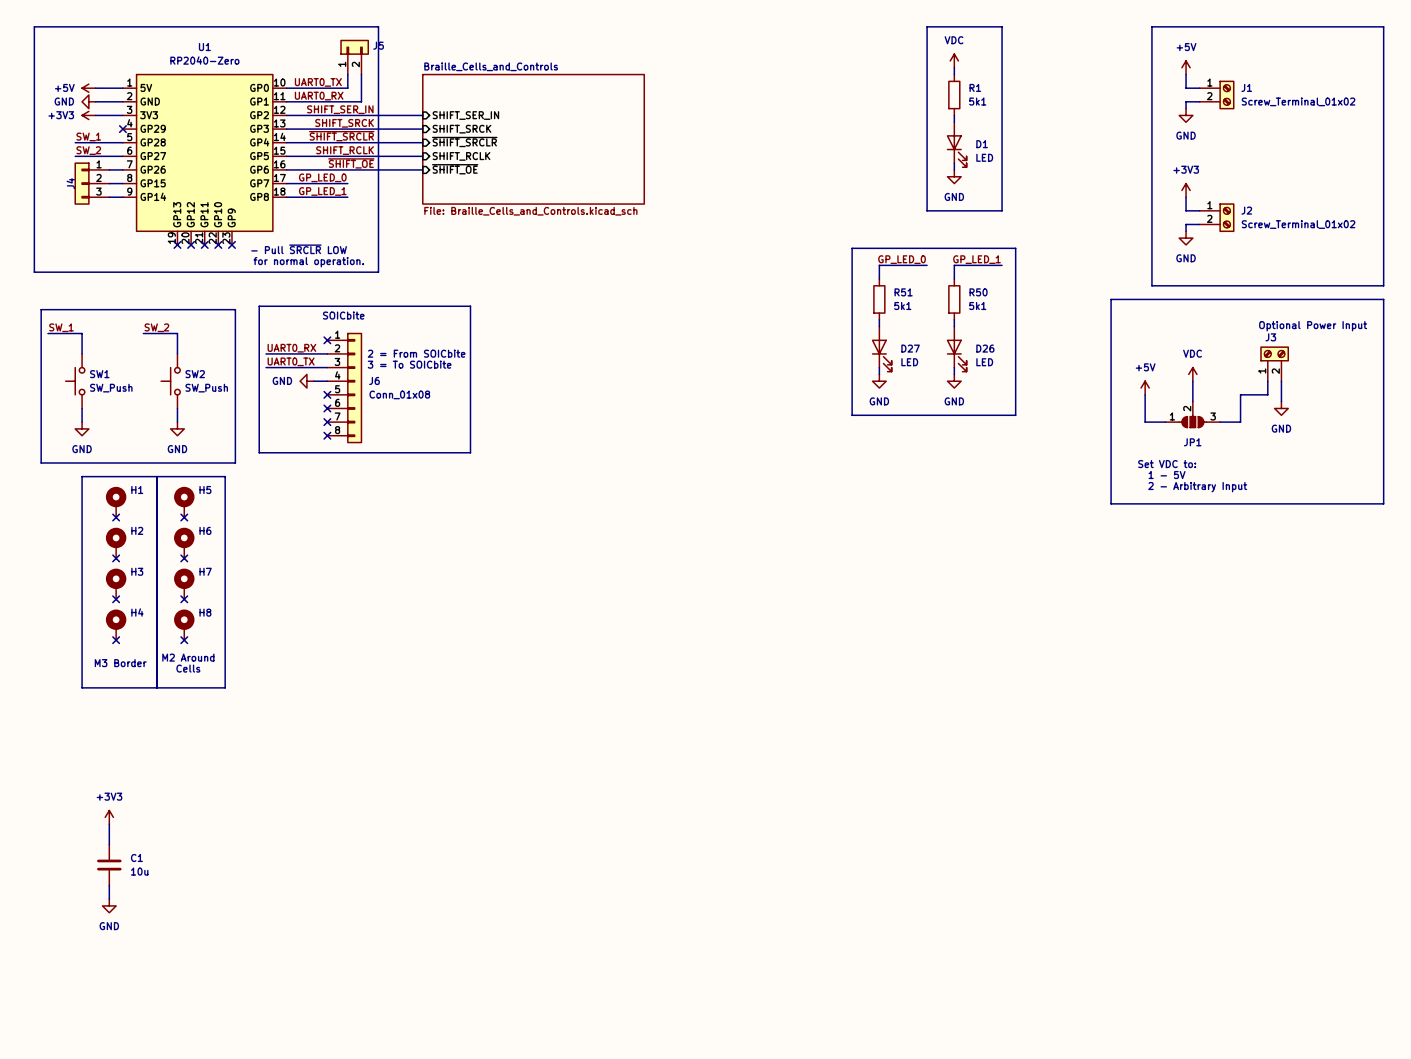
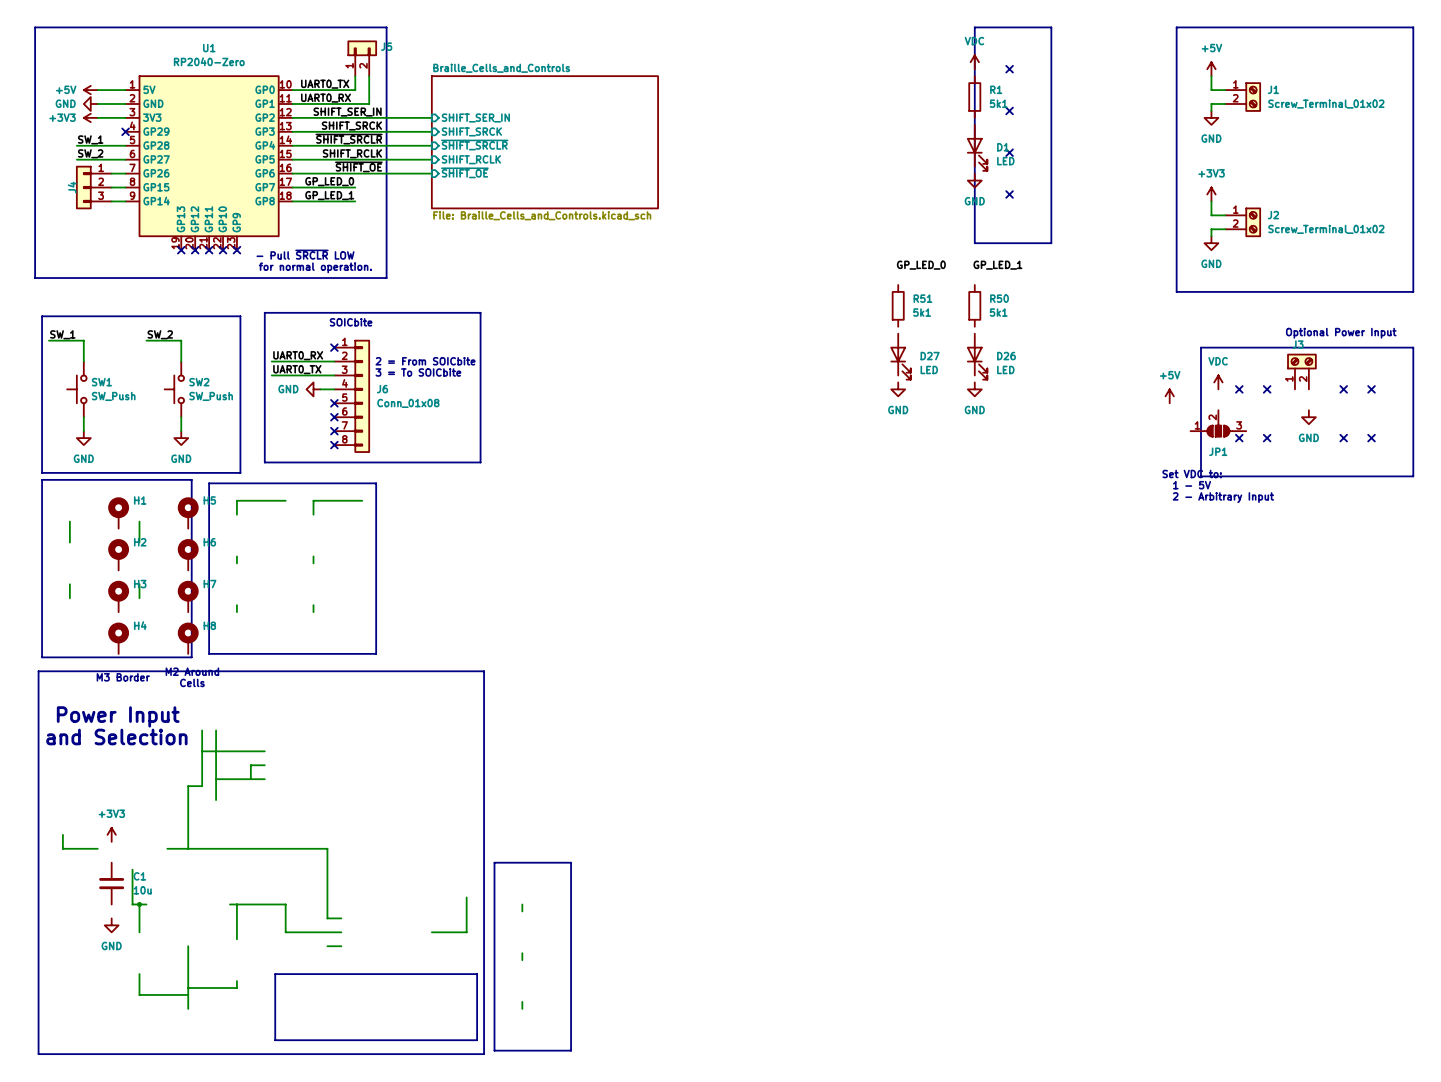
line: (954, 26) (927, 26) (927, 210) (1002, 210) (1002, 26) -> (974, 27) (974, 243) (1051, 243) (1051, 27) (1023, 27)
no-connect mark: none -> (1009, 69)
no-connect mark: none -> (1009, 110)
no-connect mark: none -> (1009, 152)
no-connect mark: none -> (1009, 194)
line: (852, 248) (1015, 248) (1015, 415) (852, 415) (852, 248) -> none
wire: (927, 265) (879, 265) (879, 278) -> none
wire: (1002, 265) (954, 265) (954, 278) -> none
wire: (879, 319) (879, 326) -> none
wire: (954, 319) (954, 326) -> none
line: (1383, 340) (1383, 299) (1111, 299) (1111, 503) (1383, 503) (1383, 466) -> (1413, 347) (1201, 347) (1201, 476) (1413, 476)
wire: (879, 367) (879, 374) -> none
wire: (954, 367) (954, 374) -> none
wire: (1192, 381) (1192, 401) -> none
no-connect mark: none -> (1239, 389)
no-connect mark: none -> (1267, 389)
wire: (1267, 381) (1267, 394) (1240, 394) (1240, 422) (1220, 422) -> none
wire: (1281, 381) (1281, 401) -> none
no-connect mark: none -> (1343, 389)
no-connect mark: none -> (1371, 389)
wire: (1145, 394) (1145, 422) (1165, 422) -> none
no-connect mark: none -> (1239, 438)
no-connect mark: none -> (1267, 438)
no-connect mark: none -> (1343, 438)
no-connect mark: none -> (1371, 438)
line: none -> (42, 479) (191, 479) (191, 657) (42, 657) (42, 479)
line: none -> (209, 483) (376, 483) (376, 653) (209, 653) (209, 483)
line: (82, 476) (225, 476) (225, 687) (82, 687) (82, 476) -> none
line: (157, 476) (157, 687) -> none
wire: none -> (285, 500) (236, 500) (236, 514)
wire: none -> (362, 500) (313, 500) (313, 514)
wire: none -> (69, 521) (69, 542)
wire: none -> (139, 521) (139, 542)
no-connect mark: (116, 517) -> none
no-connect mark: (184, 517) -> none
wire: none -> (236, 556) (236, 563)
wire: none -> (313, 556) (313, 563)
no-connect mark: (116, 558) -> none
no-connect mark: (184, 558) -> none
wire: none -> (69, 584) (69, 598)
wire: none -> (139, 584) (139, 598)
wire: none -> (236, 605) (236, 612)
wire: none -> (313, 605) (313, 612)
no-connect mark: (116, 599) -> none
no-connect mark: (184, 599) -> none
no-connect mark: (116, 640) -> none
no-connect mark: (184, 640) -> none
line: none -> (38, 671) (484, 671) (484, 1054) (38, 1054) (38, 671)
text: none -> Power Input (118, 716)
wire: none -> (202, 730) (202, 786) (188, 786) (188, 848)
wire: none -> (216, 730) (216, 800)
text: none -> and Selection (116, 736)
wire: none -> (202, 751) (264, 751)
wire: none -> (264, 765) (250, 765) (250, 779)
wire: none -> (216, 779) (264, 779)
wire: none -> (62, 834) (62, 848) (97, 848)
wire: (109, 824) (109, 844) -> none
wire: none -> (167, 848) (327, 848) (327, 918) (341, 918)
line: none -> (494, 862) (571, 862) (571, 1050) (494, 1050) (494, 862)
wire: none -> (132, 869) (132, 904) (146, 904)
wire: none -> (466, 897) (466, 932) (431, 932)
wire: (109, 885) (109, 899) -> none
wire: none -> (139, 904) (139, 932)
junction: none -> (139, 904)
wire: none -> (229, 904) (285, 904) (285, 932) (341, 932)
wire: none -> (236, 904) (236, 939)
wire: none -> (522, 904) (522, 911)
wire: none -> (188, 946) (188, 1008)
wire: none -> (327, 946) (341, 946)
wire: none -> (522, 953) (522, 960)
wire: none -> (139, 974) (139, 994) (188, 994)
line: none -> (275, 974) (477, 974) (477, 1040) (275, 1040) (275, 974)
wire: none -> (236, 981) (236, 988) (188, 988)
wire: none -> (522, 1001) (522, 1008)

